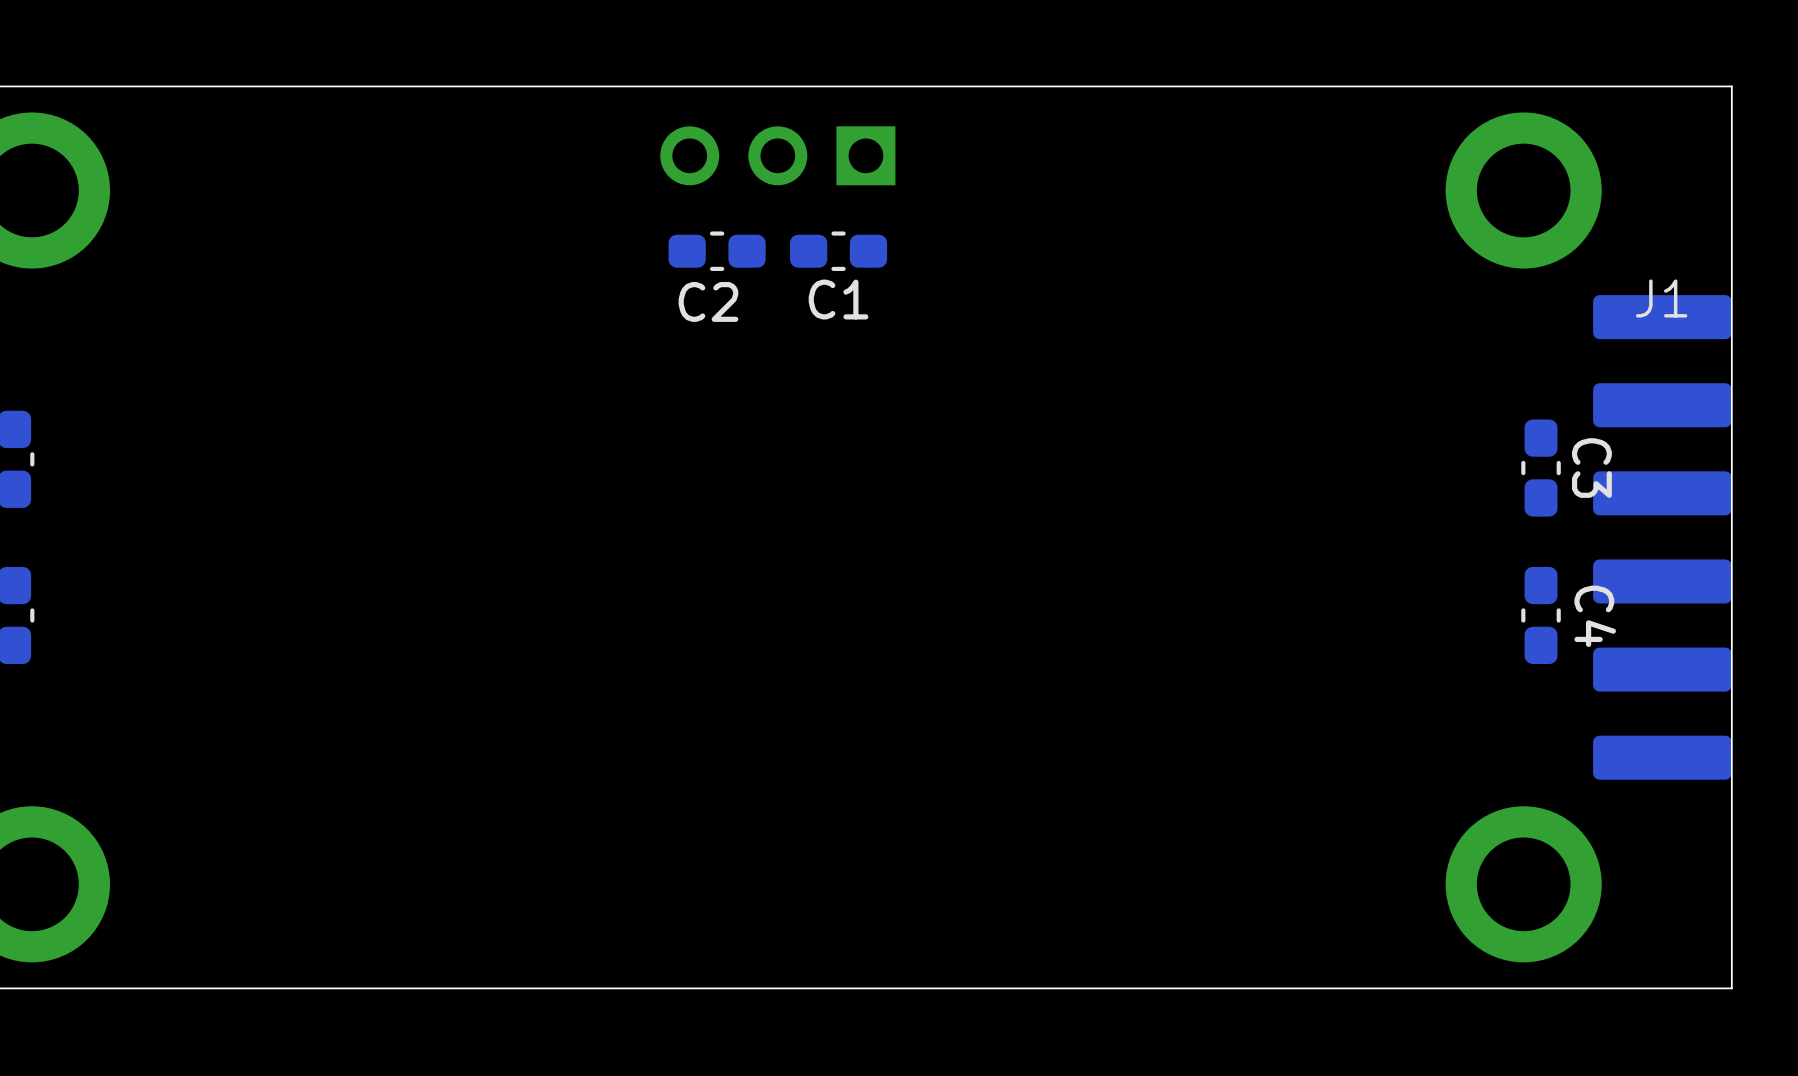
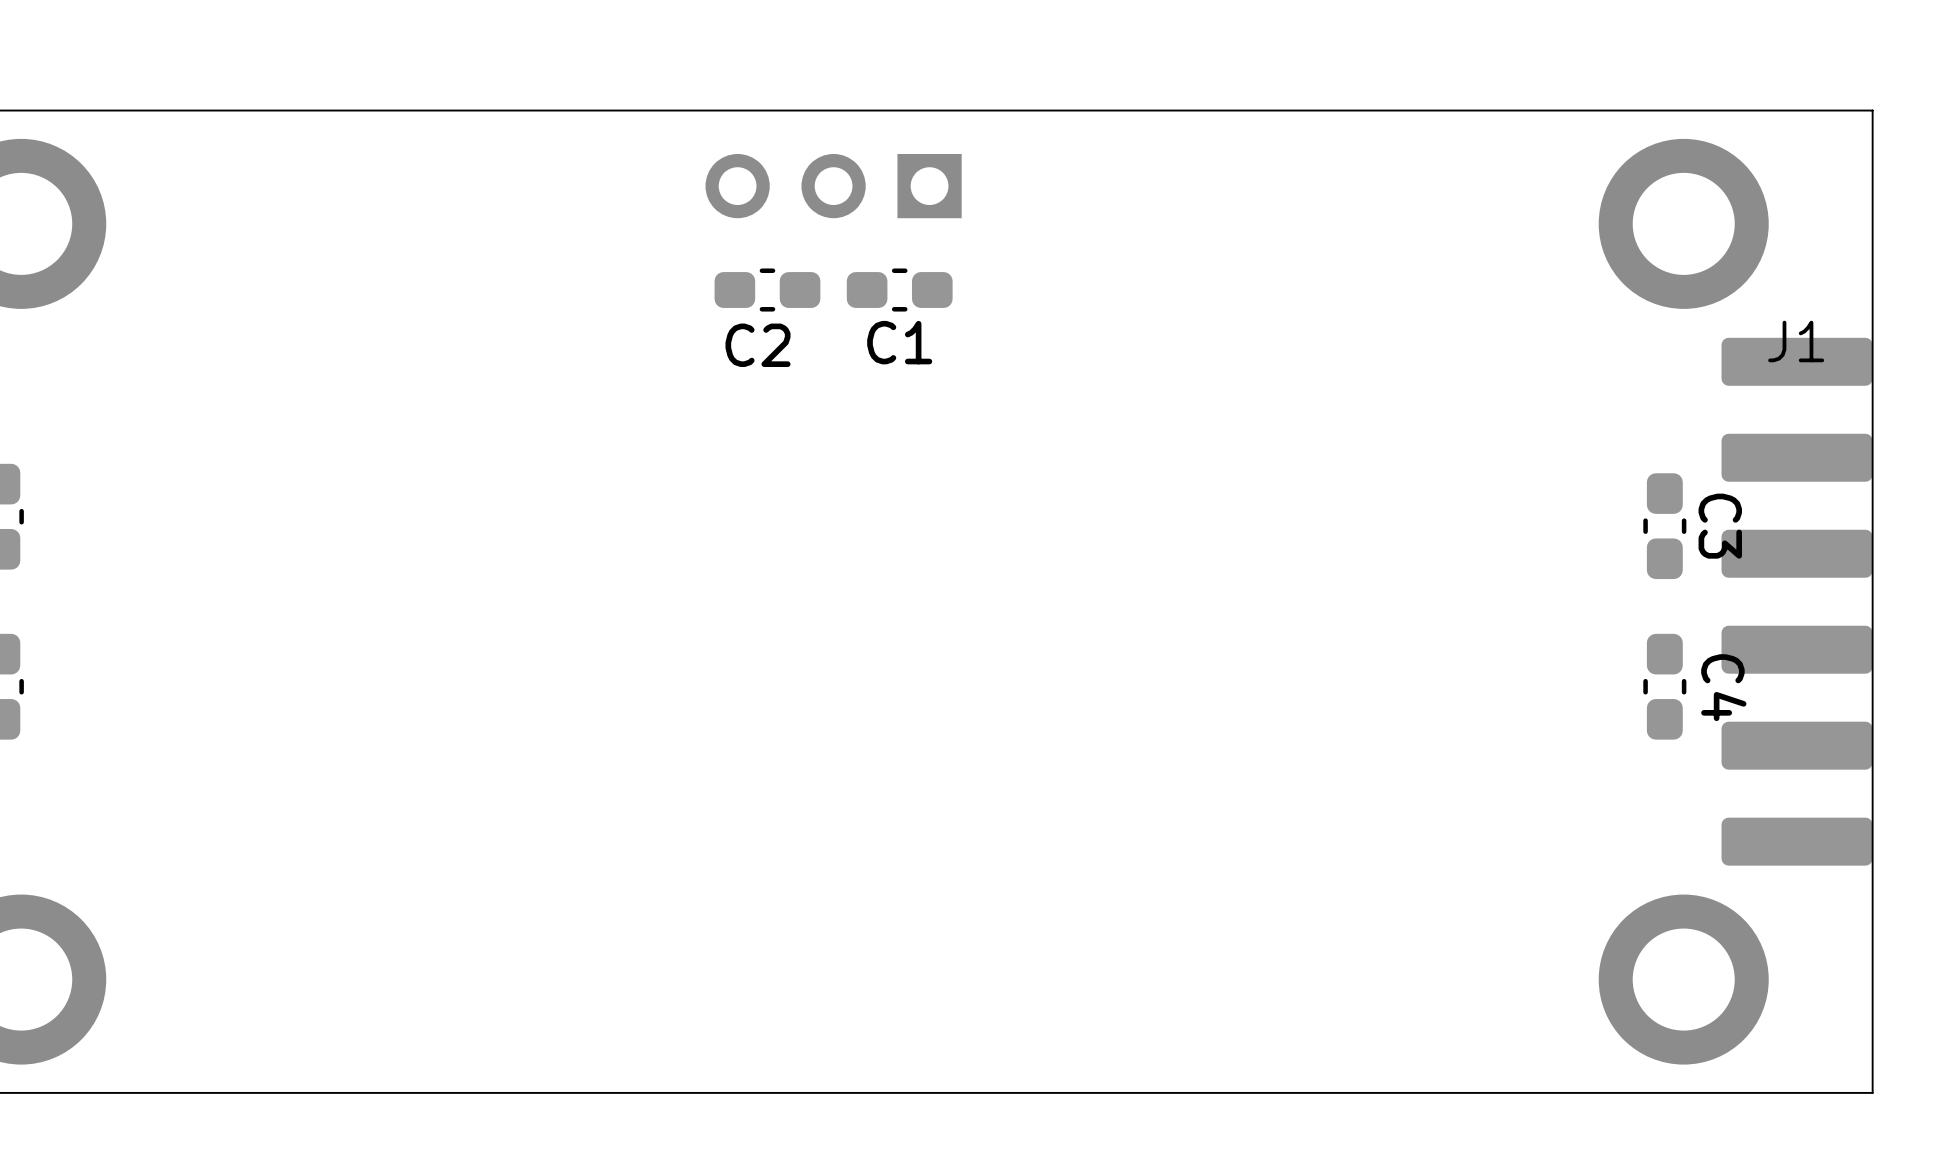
part position: (1523, 190) -> (1683, 223)
part position: (1523, 884) -> (1683, 979)

